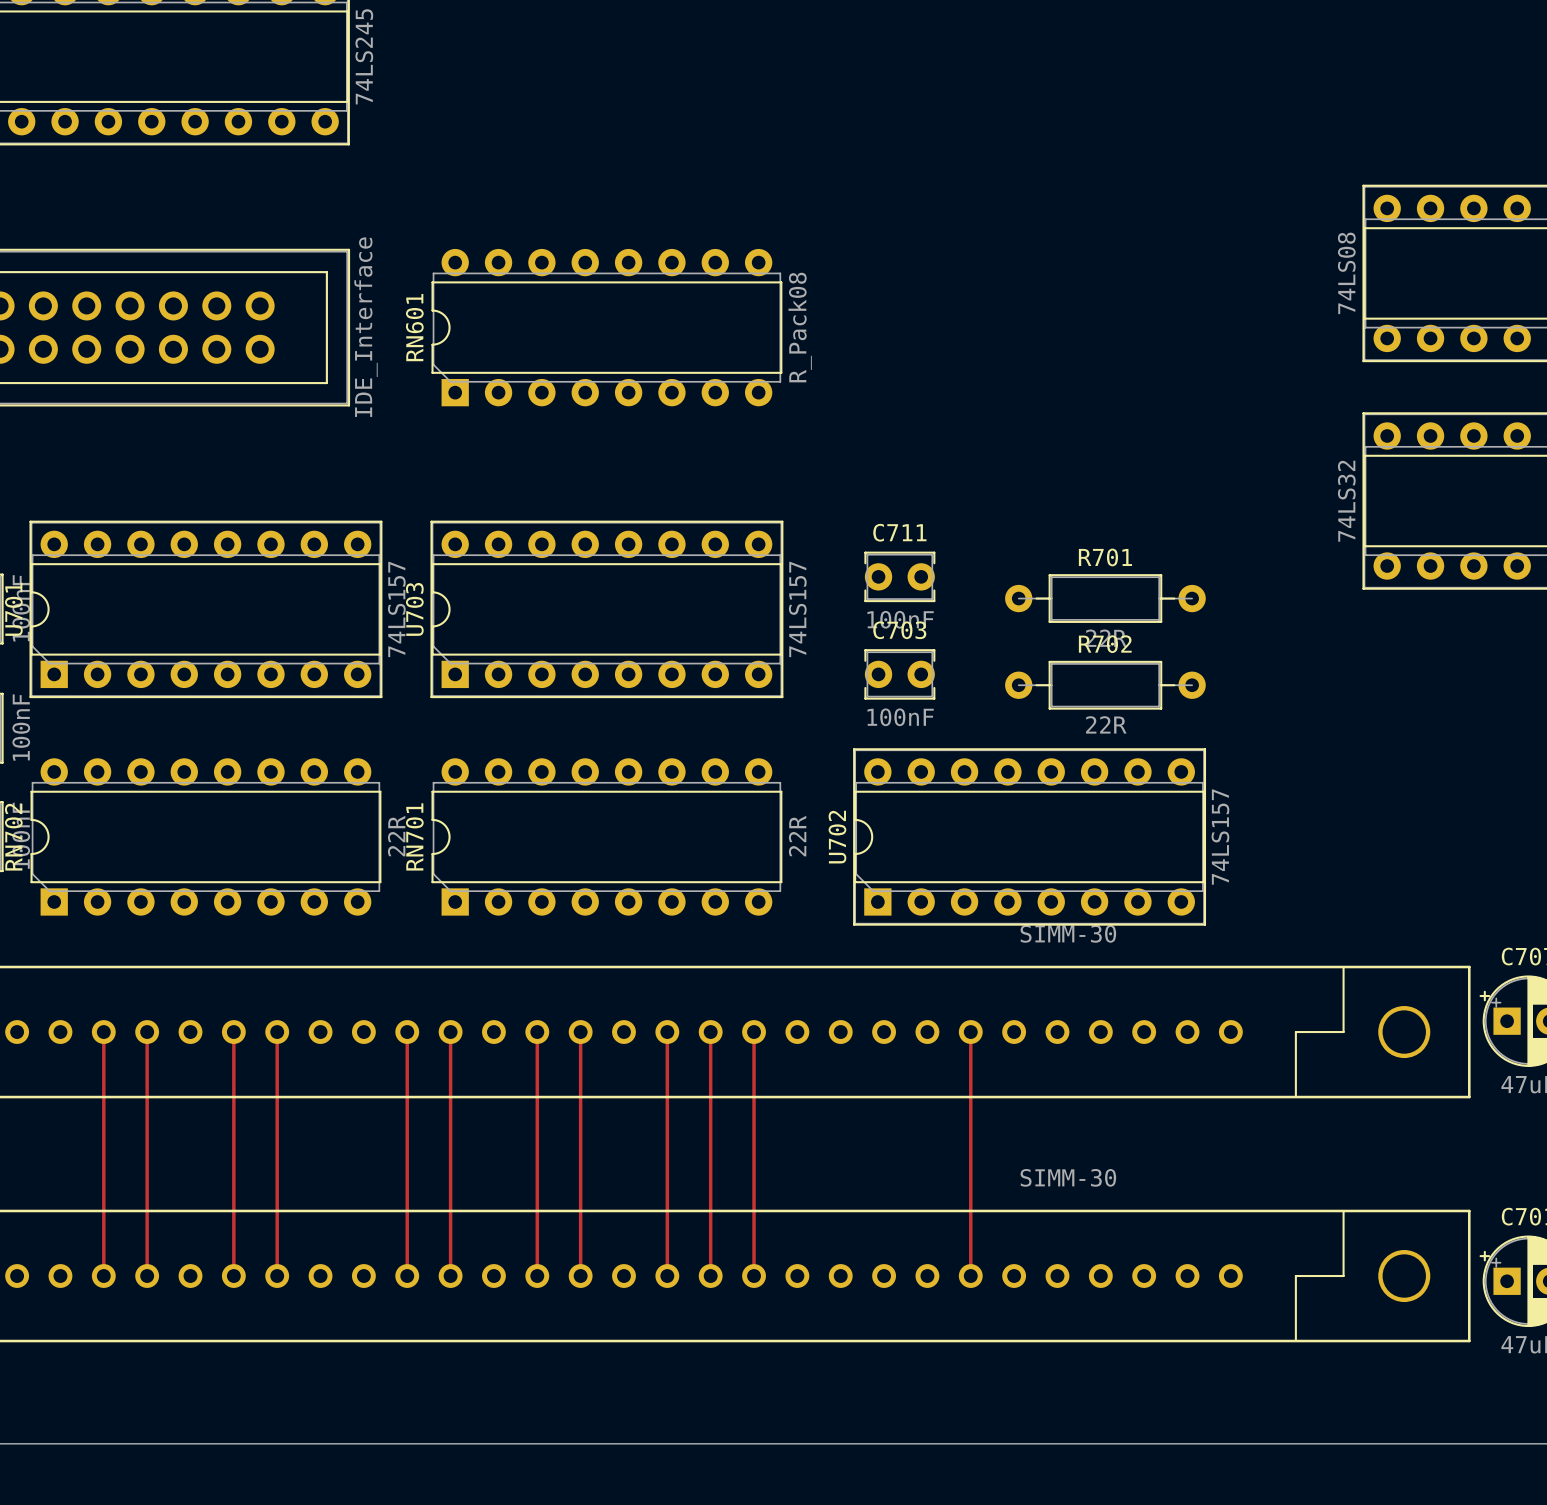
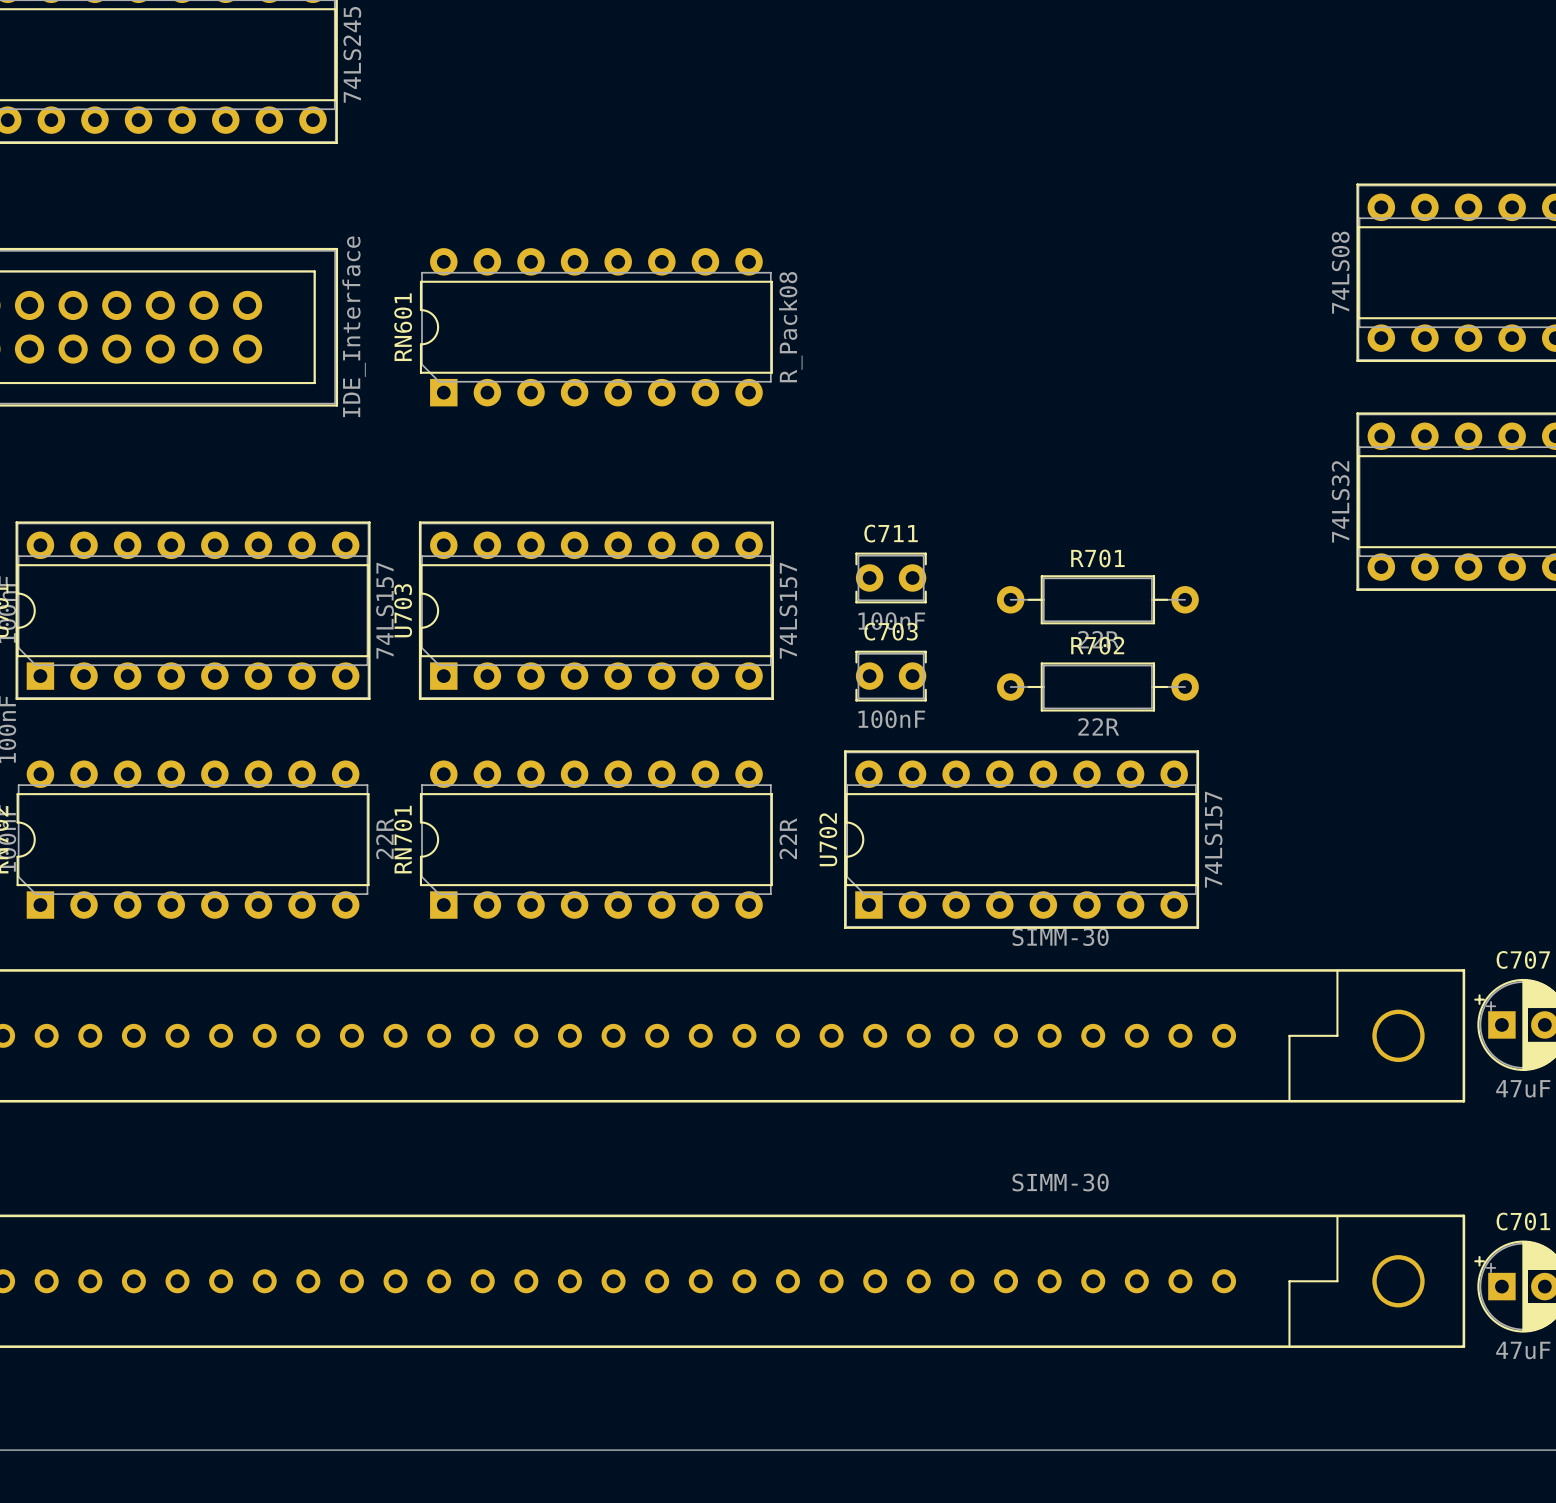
track: (103, 1032) (103, 1276) -> none
track: (147, 1032) (147, 1276) -> none
track: (233, 1032) (233, 1276) -> none
track: (277, 1032) (277, 1276) -> none
track: (407, 1032) (407, 1276) -> none
track: (450, 1032) (450, 1276) -> none
track: (537, 1032) (537, 1276) -> none
track: (580, 1032) (580, 1276) -> none
track: (667, 1032) (667, 1276) -> none
track: (710, 1032) (710, 1276) -> none
track: (754, 1032) (754, 1276) -> none
track: (970, 1032) (970, 1276) -> none

